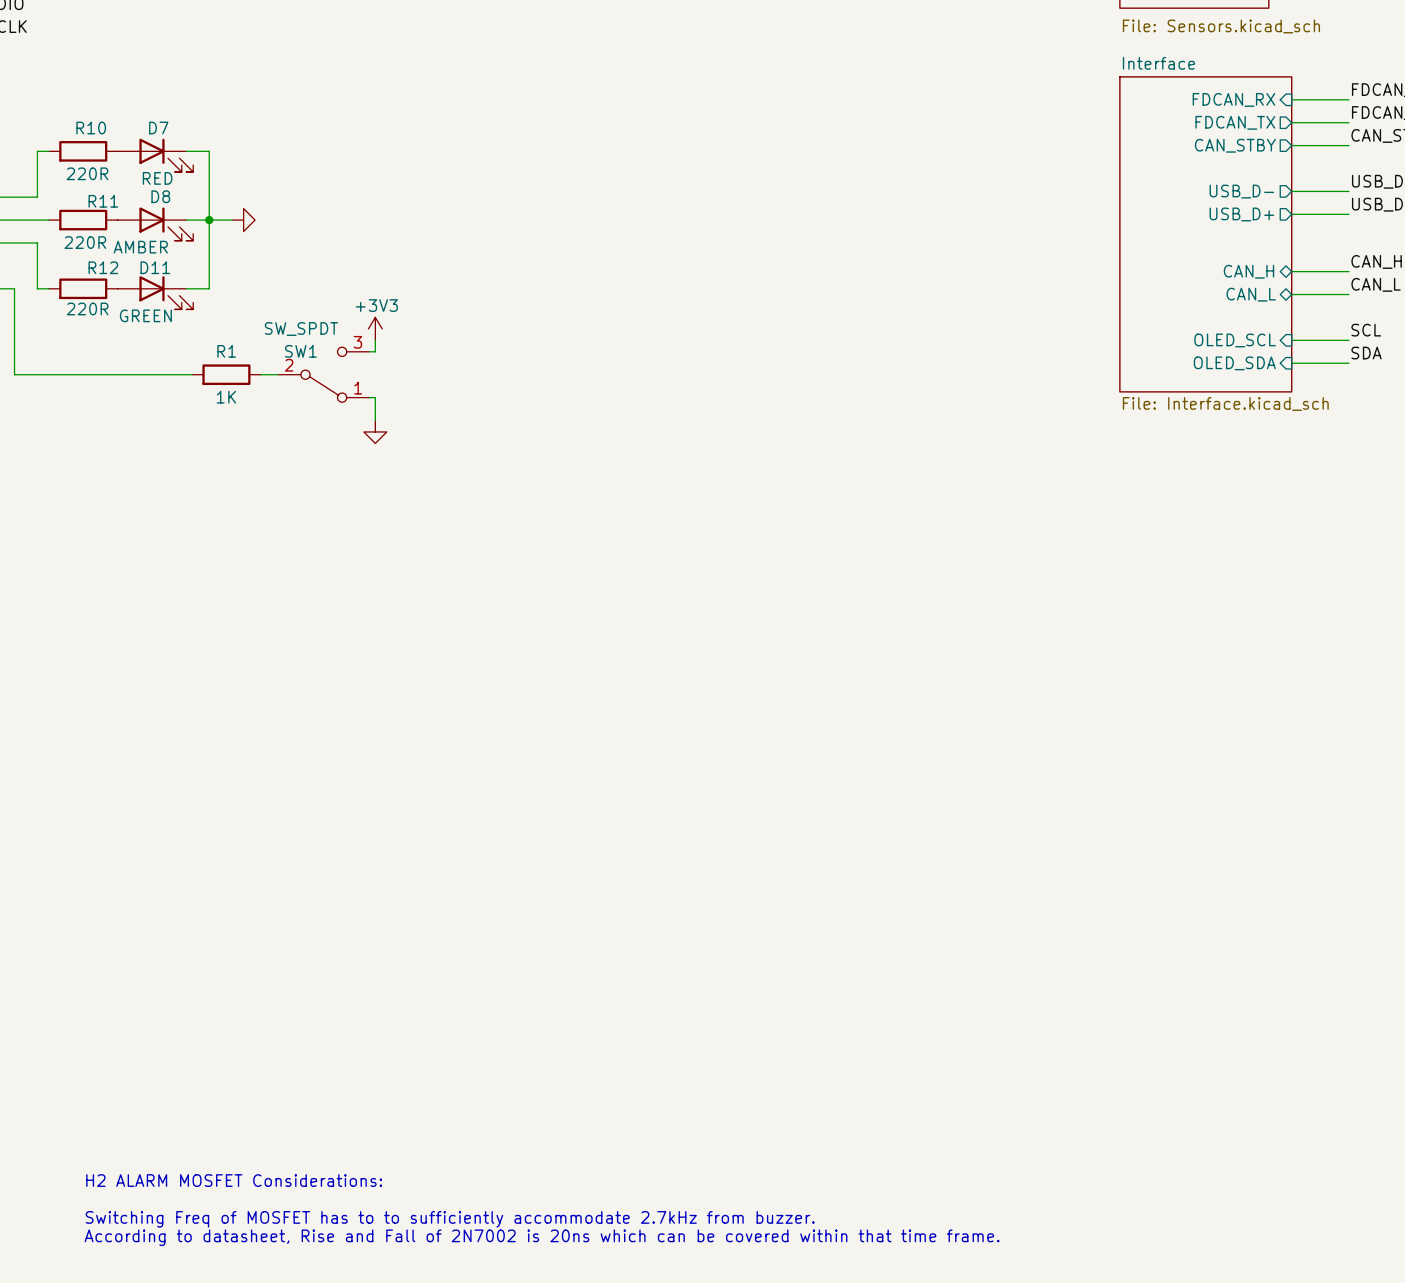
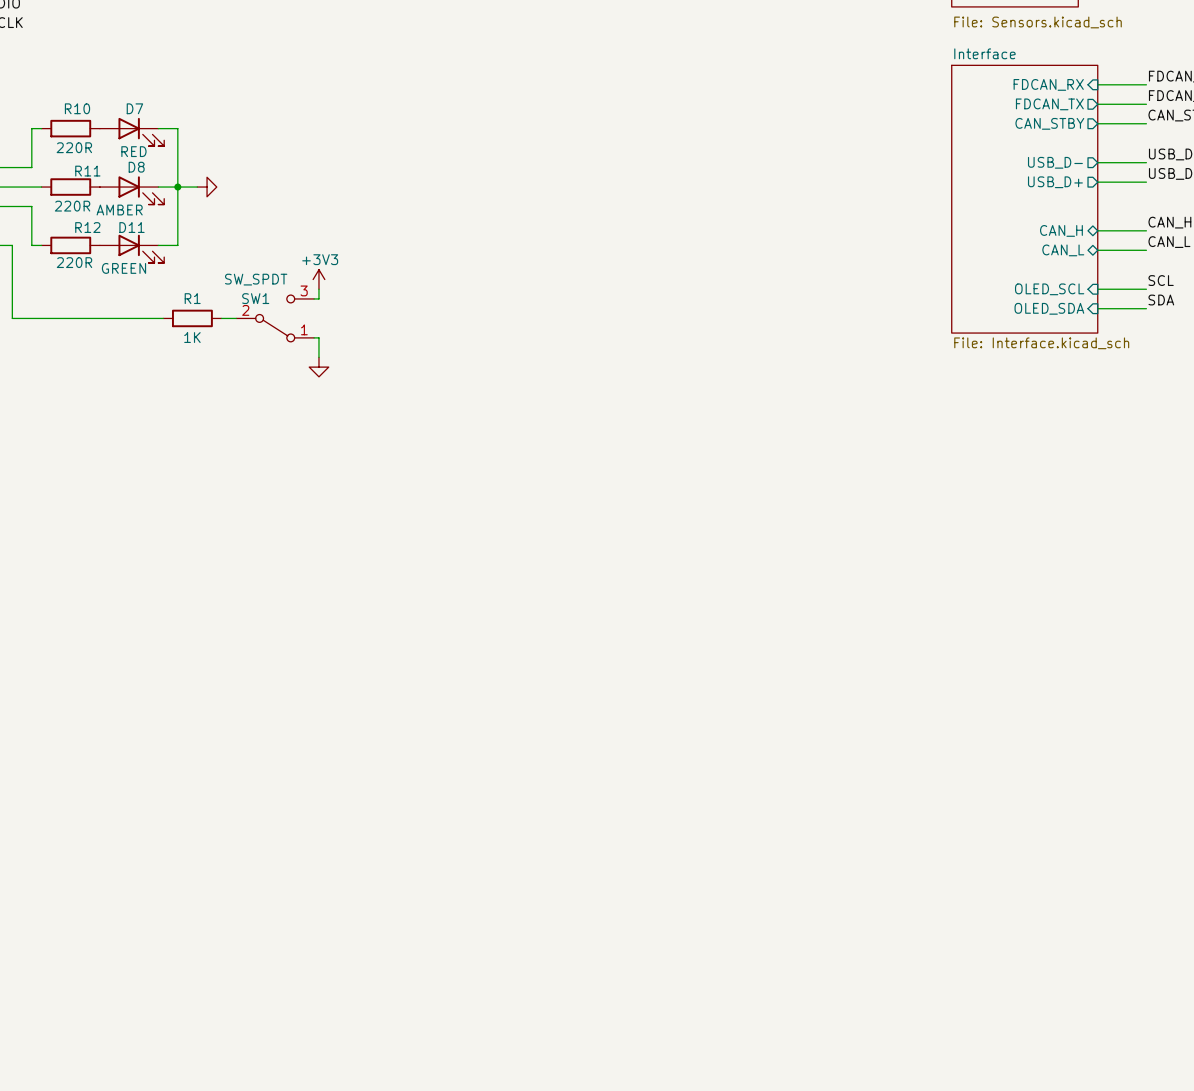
text: H2 ALARM MOSFET Considerations: (234, 1180) -> none
text: Switching Freq of MOSFET has to to sufficiently accommodate 2.7kHz from buzzer. (450, 1219) -> none
text: According to datasheet, Rise and Fall of 2N7002 is 20ns which can be covered within that time frame. (542, 1237) -> none

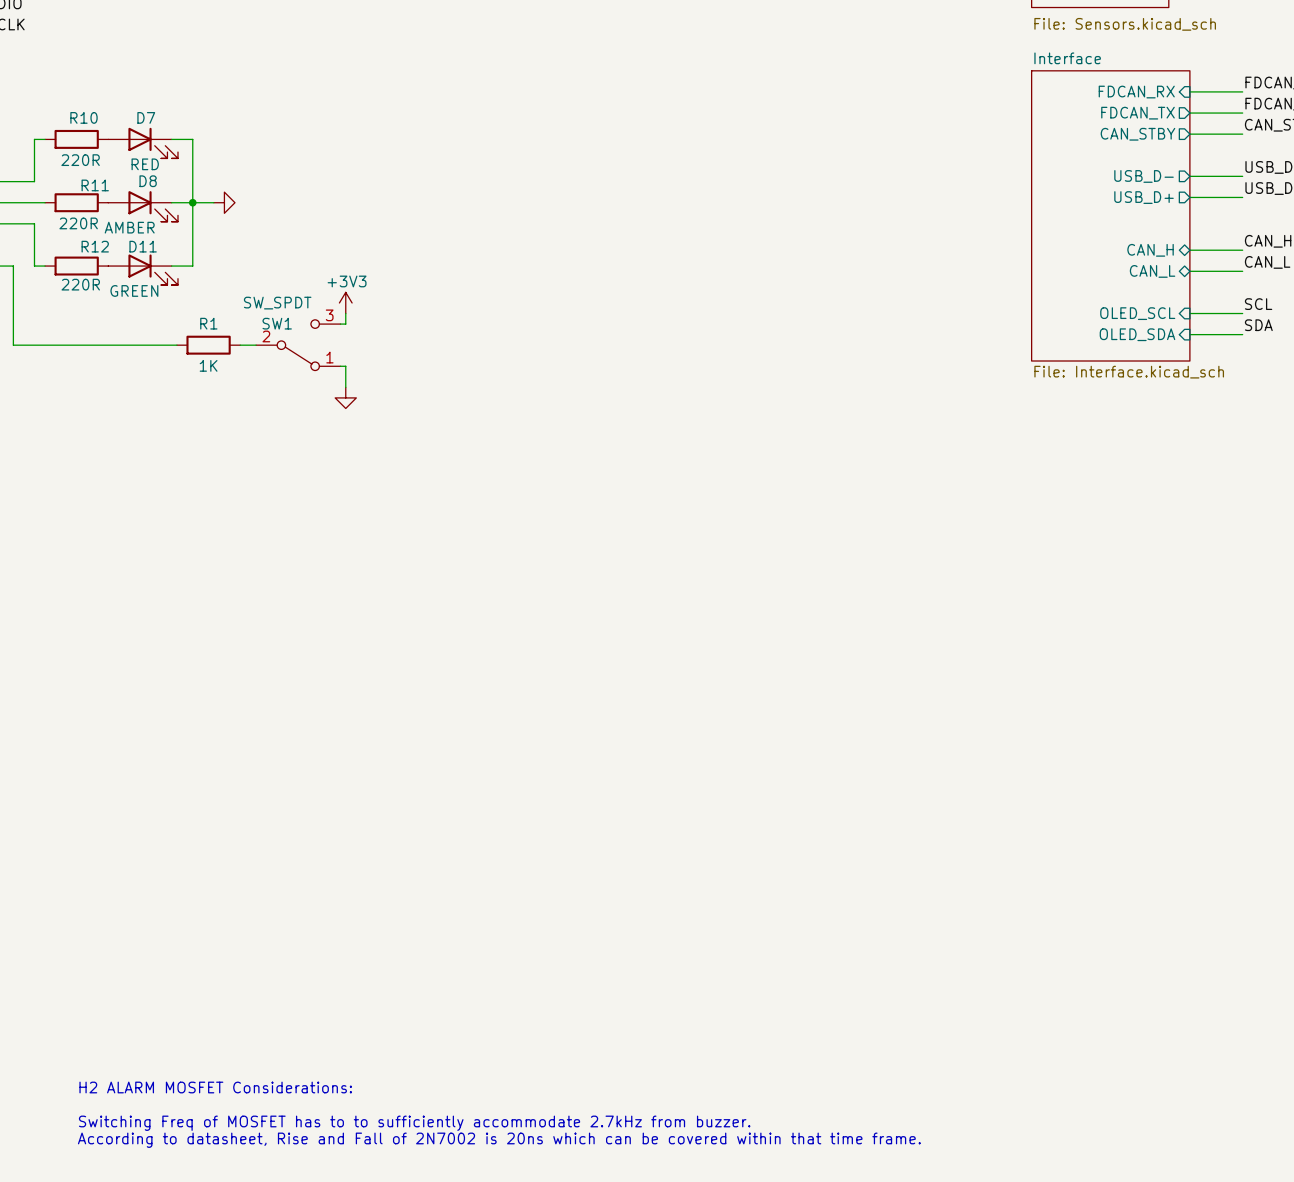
text: none -> H2 ALARM MOSFET Considerations: (215, 1087)
text: none -> Switching Freq of MOSFET has to to sufficiently accommodate 2.7kHz from buzzer. (414, 1123)
text: none -> According to datasheet, Rise and Fall of 2N7002 is 20ns which can be covered within that time frame. (499, 1140)

